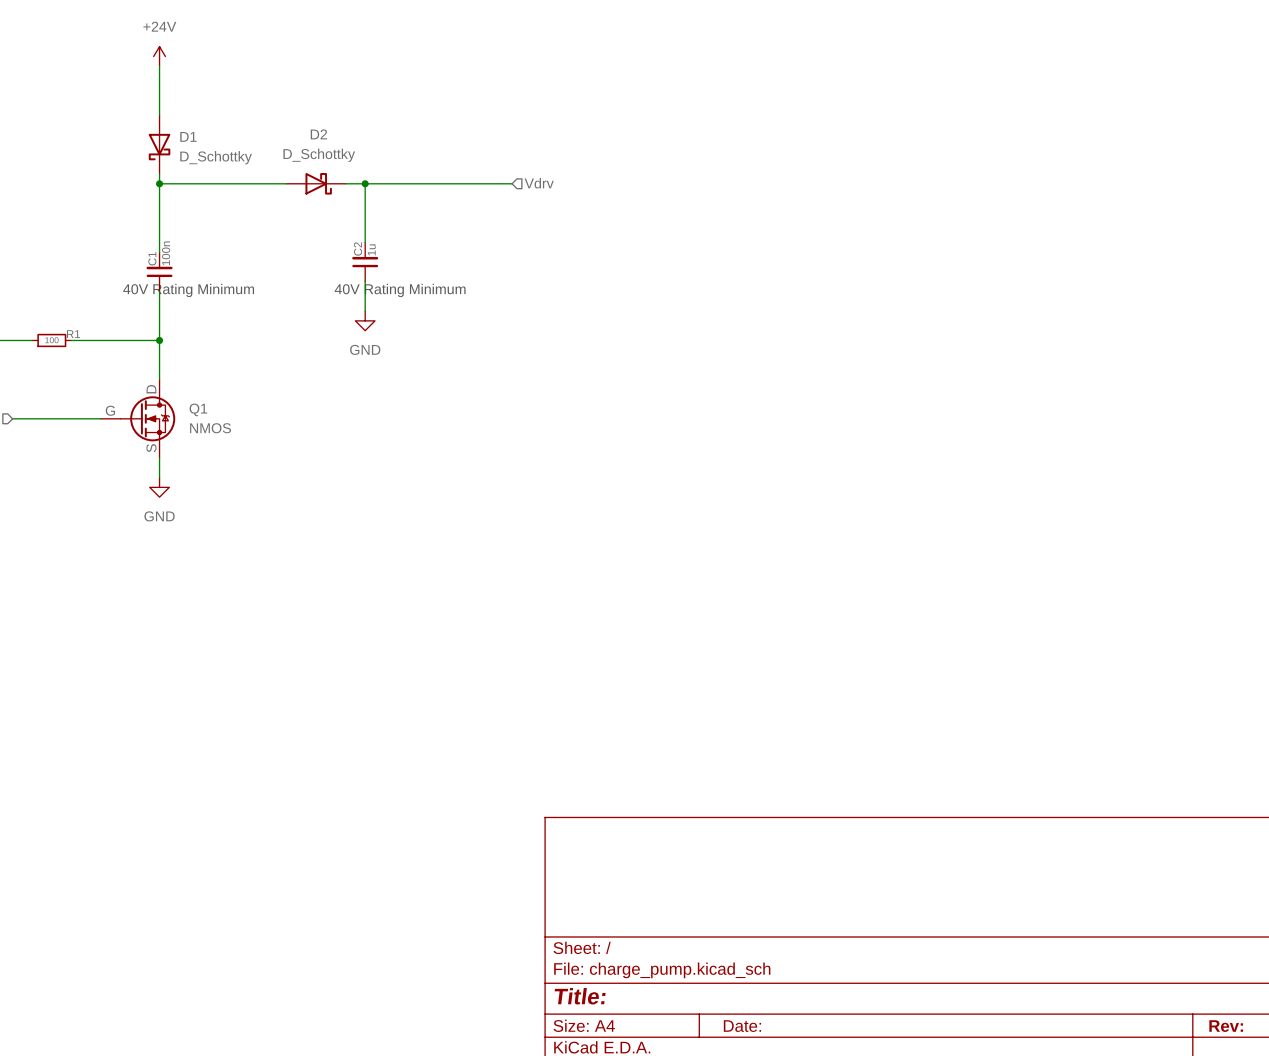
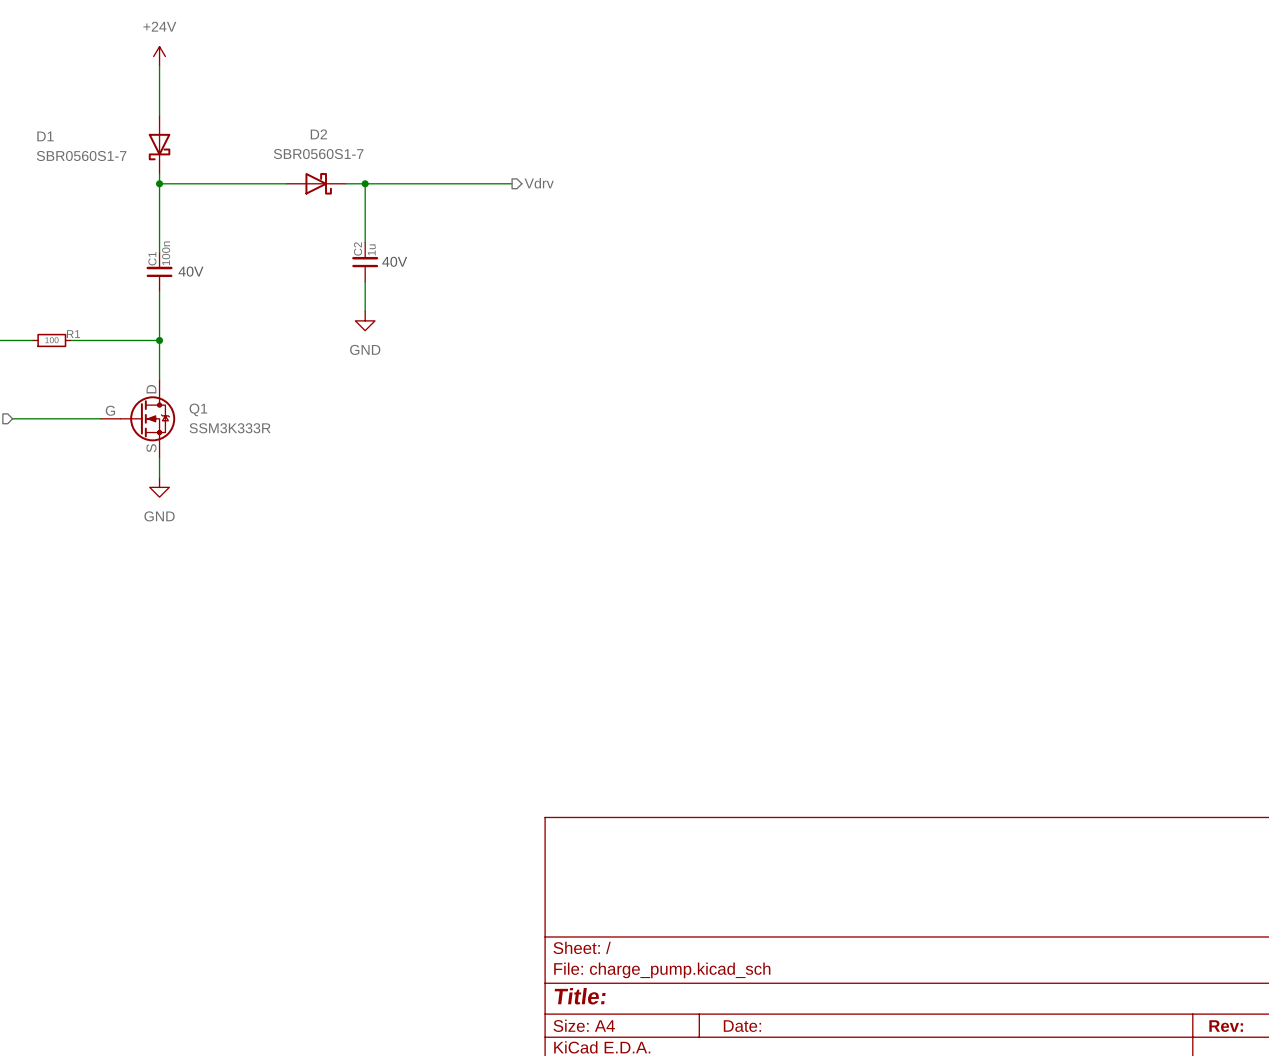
D1 name position: D1 (188, 136) -> D1 (45, 136)
D2 value: D_Schottky (319, 155) -> SBR0560S1-7 (318, 154)
D1 value: D_Schottky (216, 157) -> SBR0560S1-7 (81, 156)
hierarchical label shape: input (539, 183) -> output (539, 183)
text: none -> 40V (394, 261)
text: none -> 40V (191, 271)
text: 40V Rating Minimum (188, 290) -> none
text: 40V Rating Minimum (400, 290) -> none
Q1 value: NMOS (210, 428) -> SSM3K333R (230, 428)

